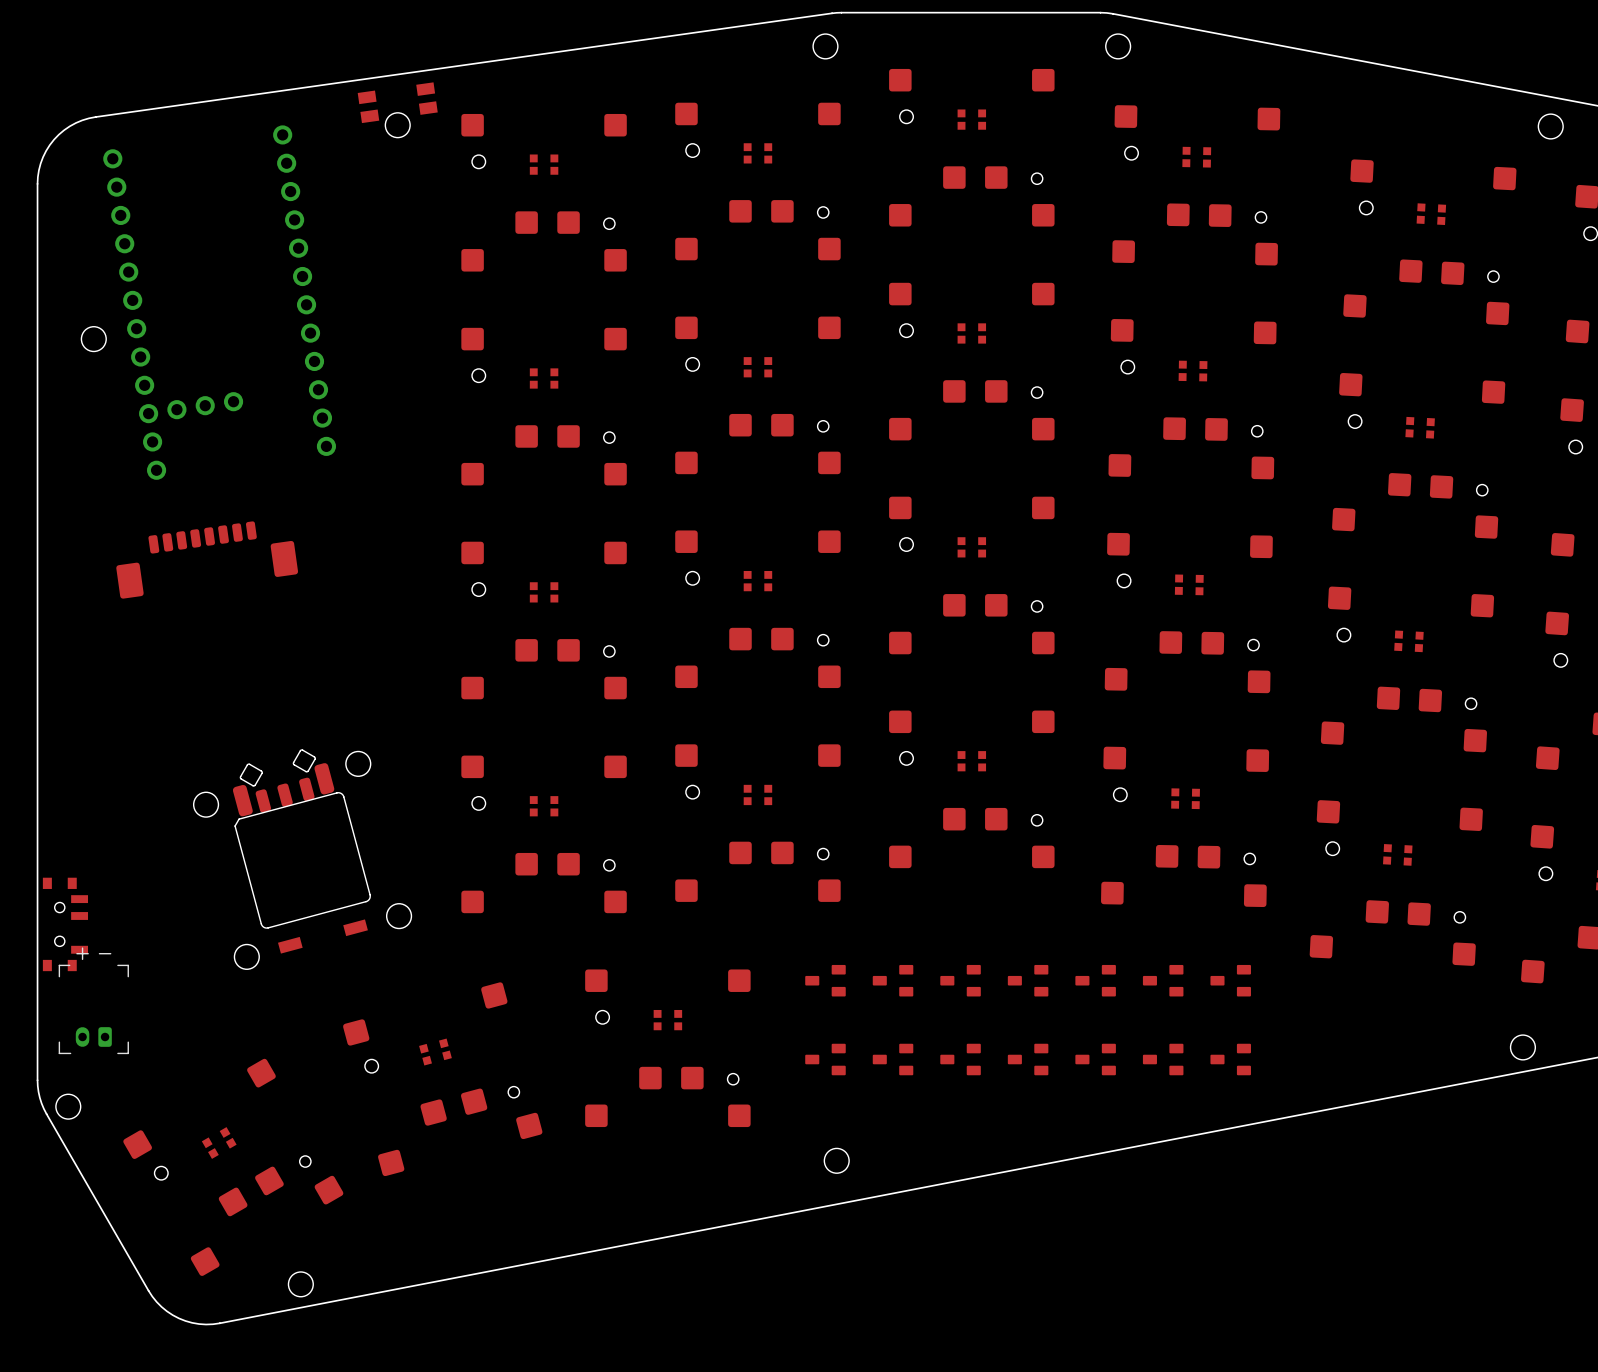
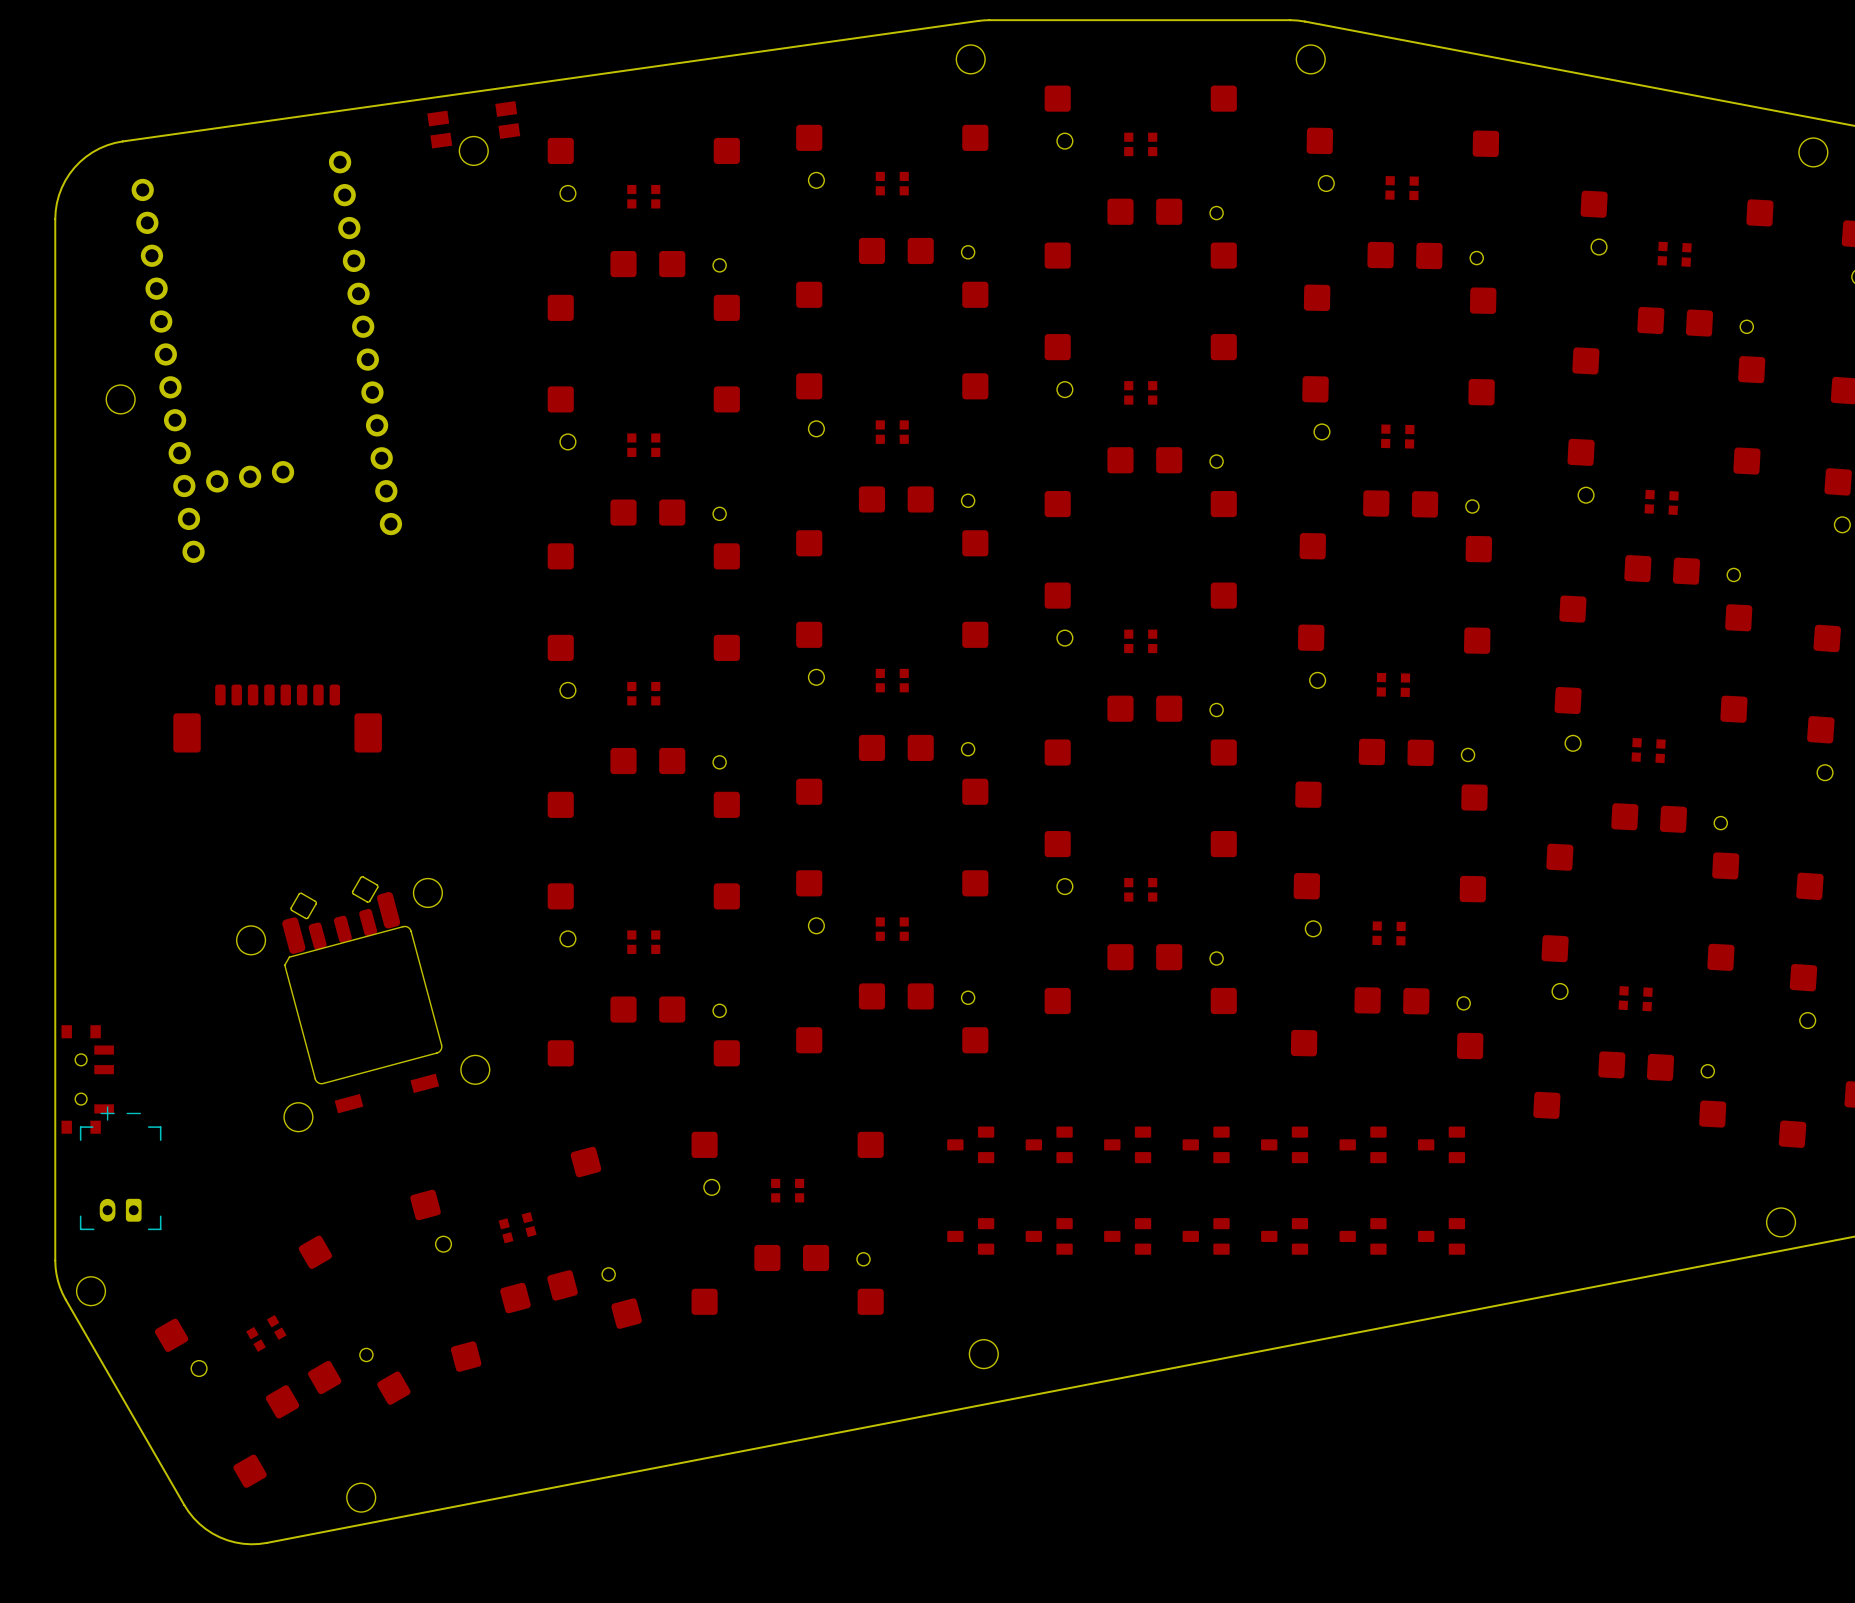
part: (207, 560) -> none
part: none -> (277, 718)

